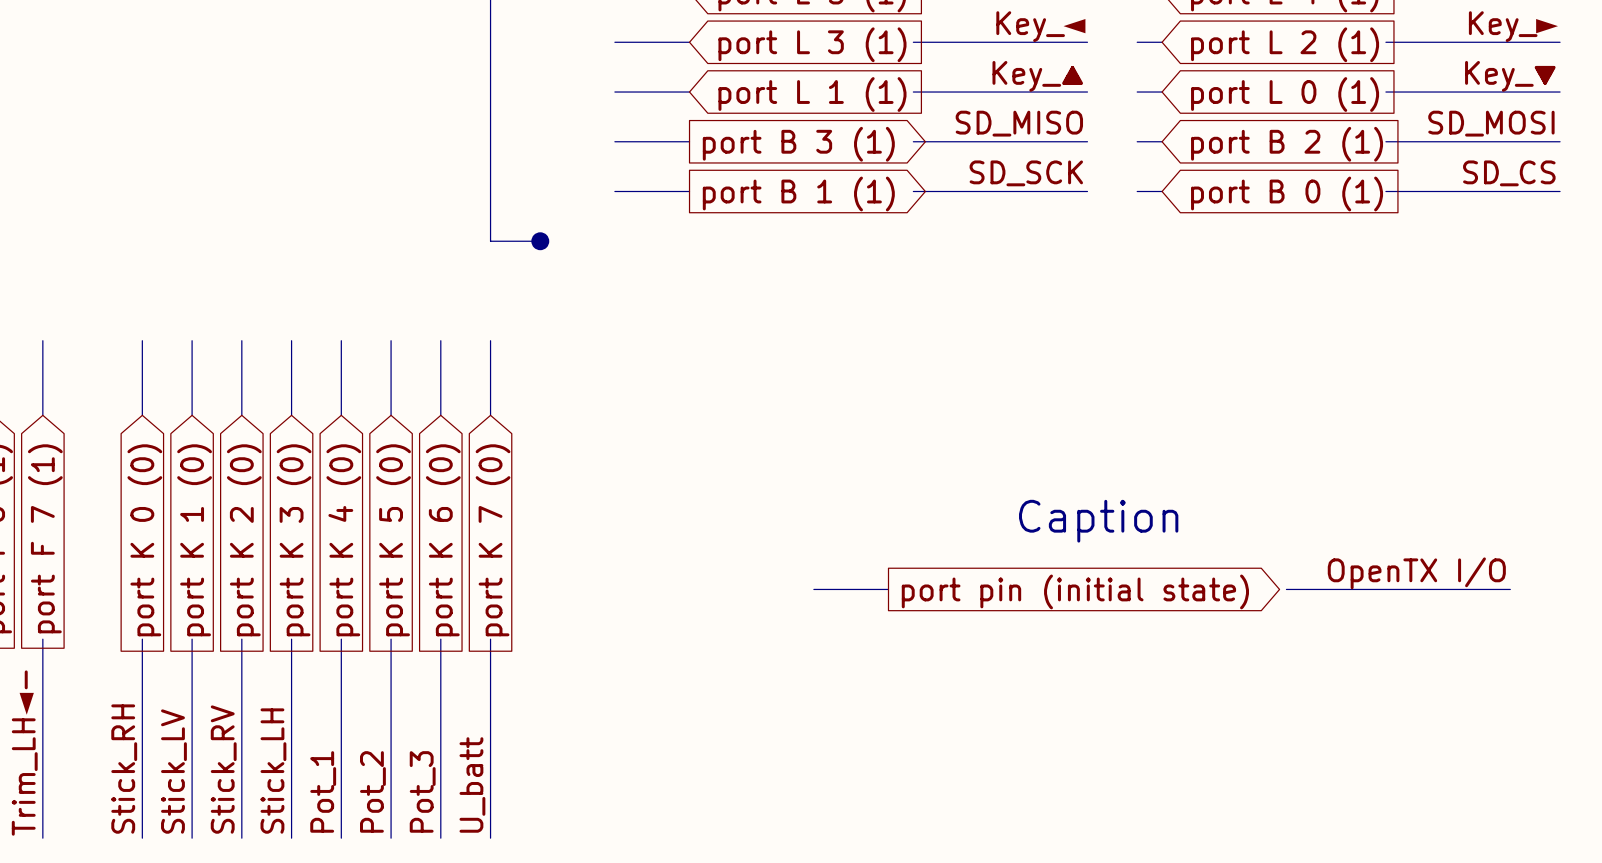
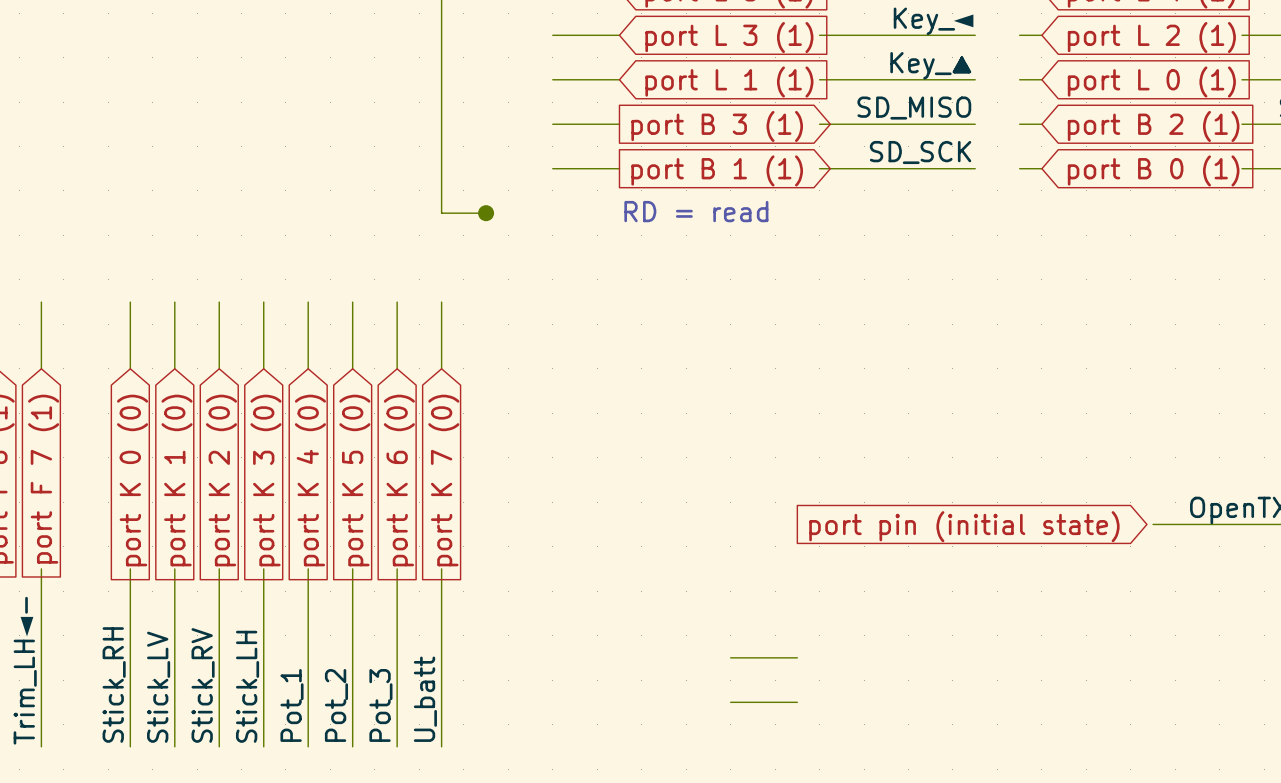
text: none -> RD = read (696, 211)
text: Caption (1098, 521) -> none
wire: (813, 589) (888, 589) -> (730, 657) (797, 657)
wire: none -> (730, 702) (797, 702)

